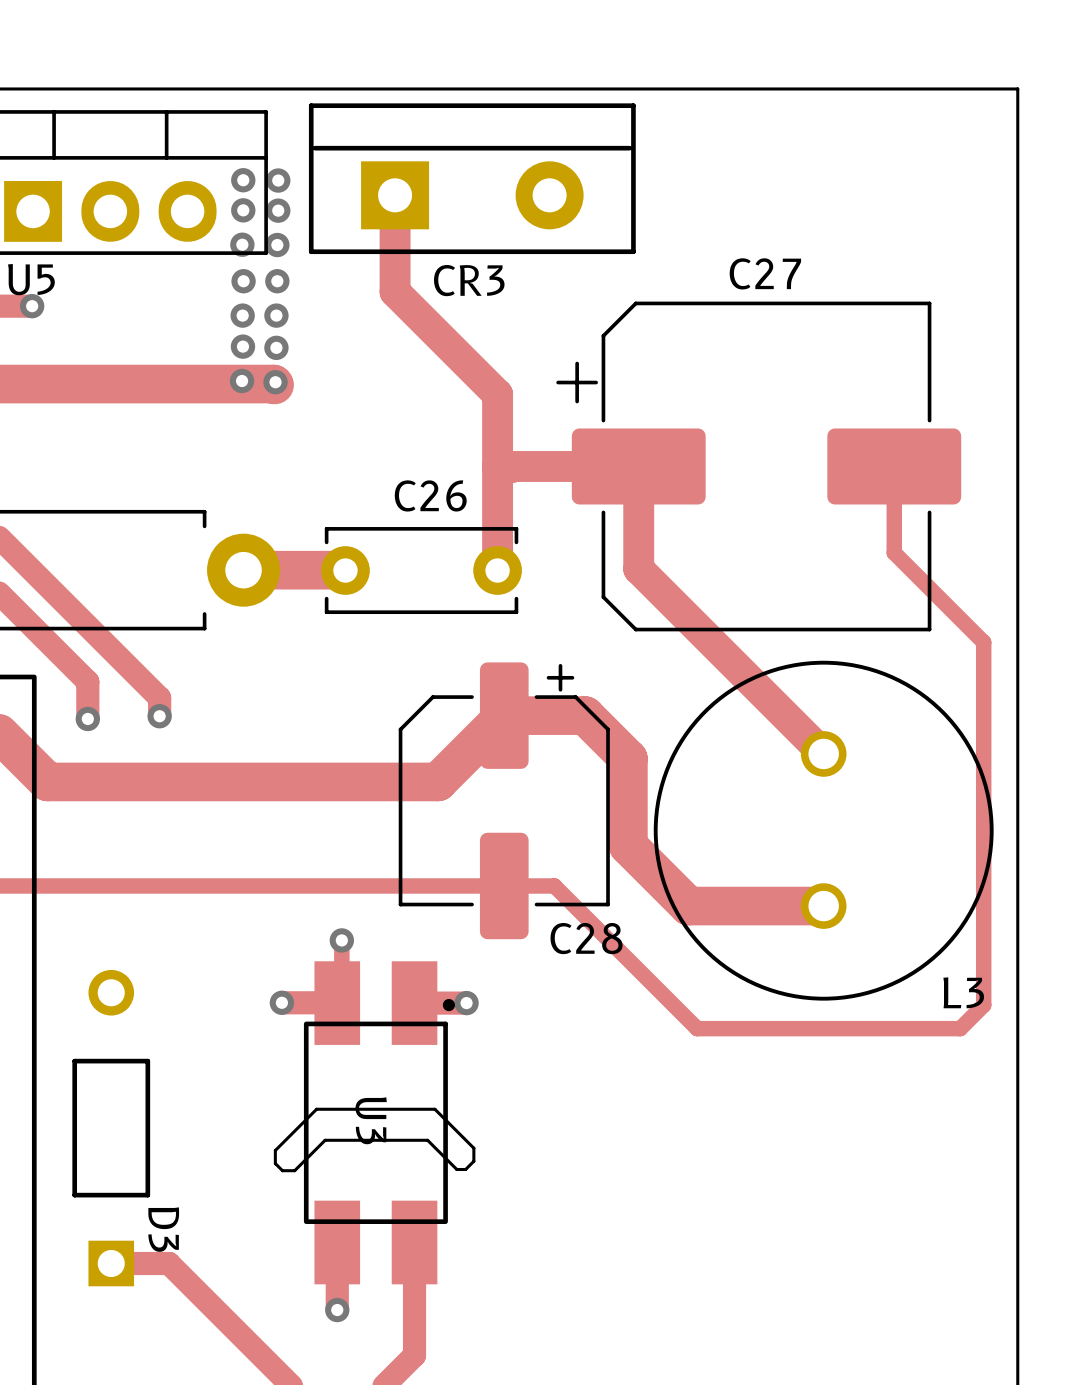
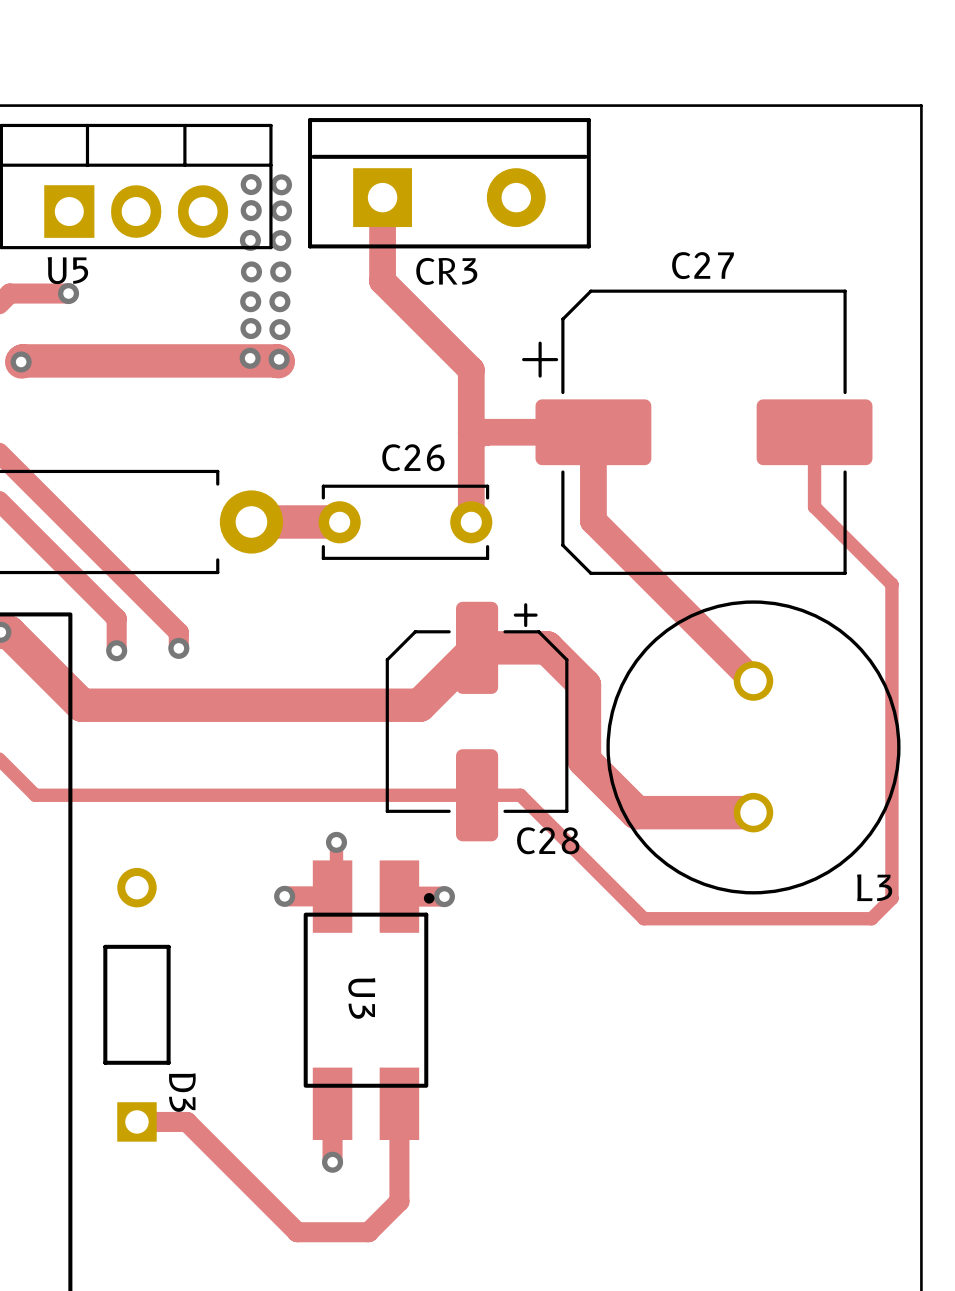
board edge: (275, 1163) (275, 1150) (316, 1109) (434, 1109) (473, 1148) (473, 1161) (465, 1169) (456, 1169) (427, 1140) (325, 1140) (294, 1170) (282, 1170) (275, 1163) -> none

